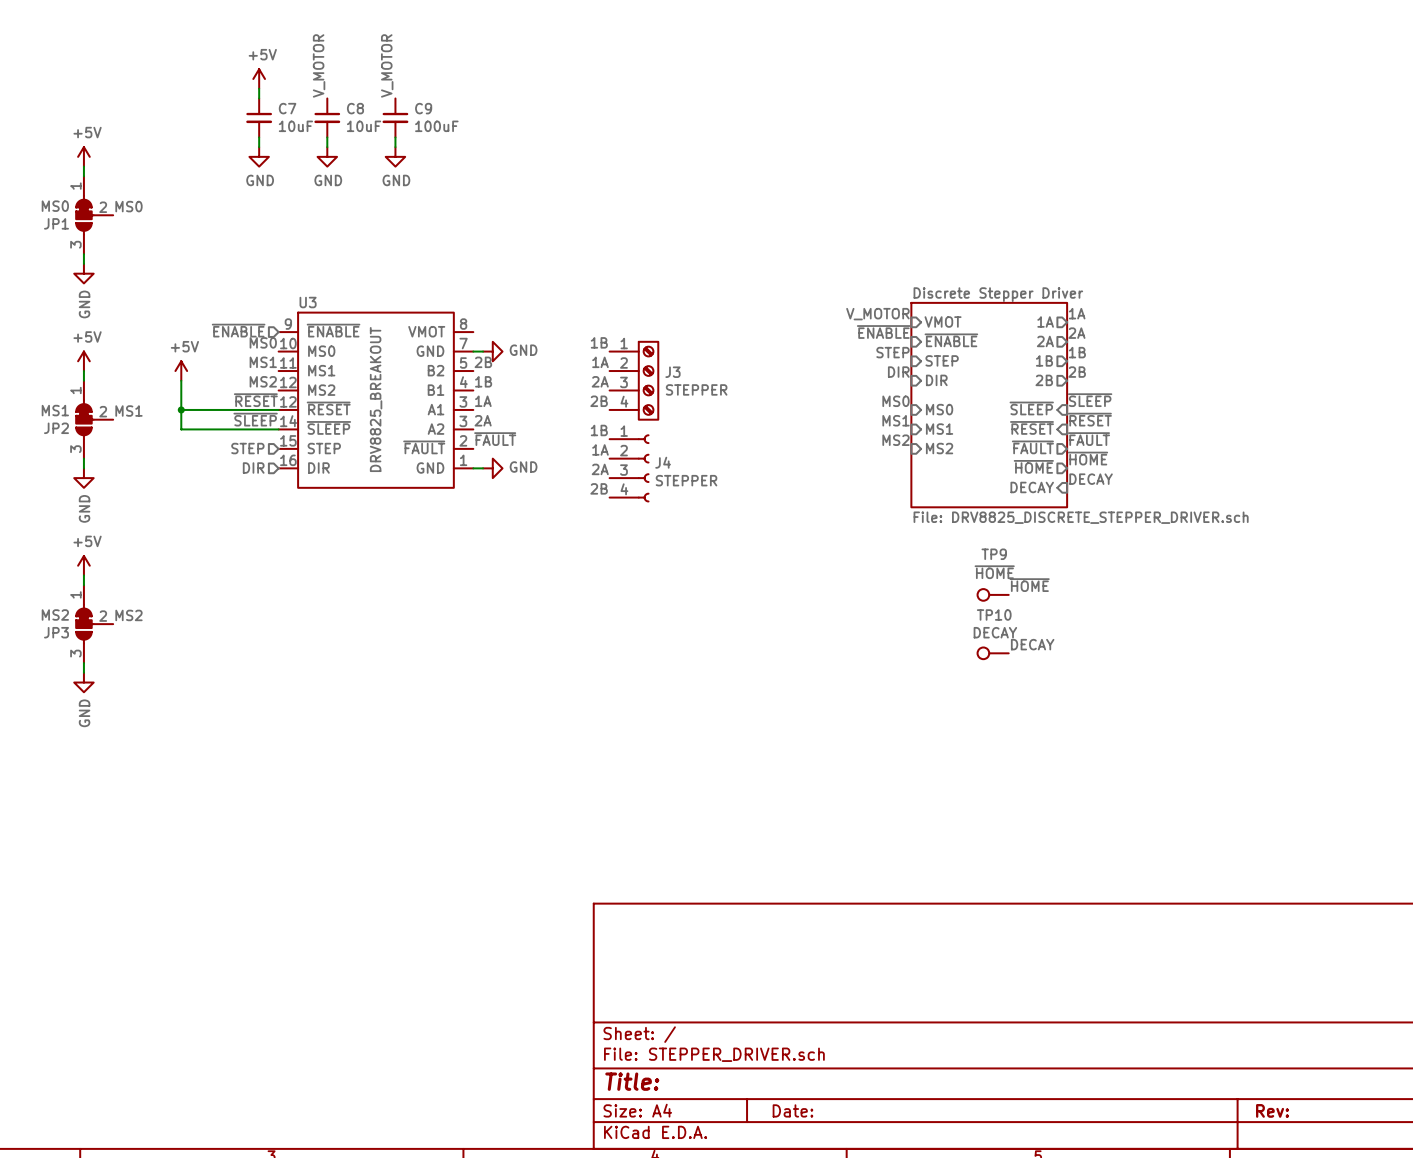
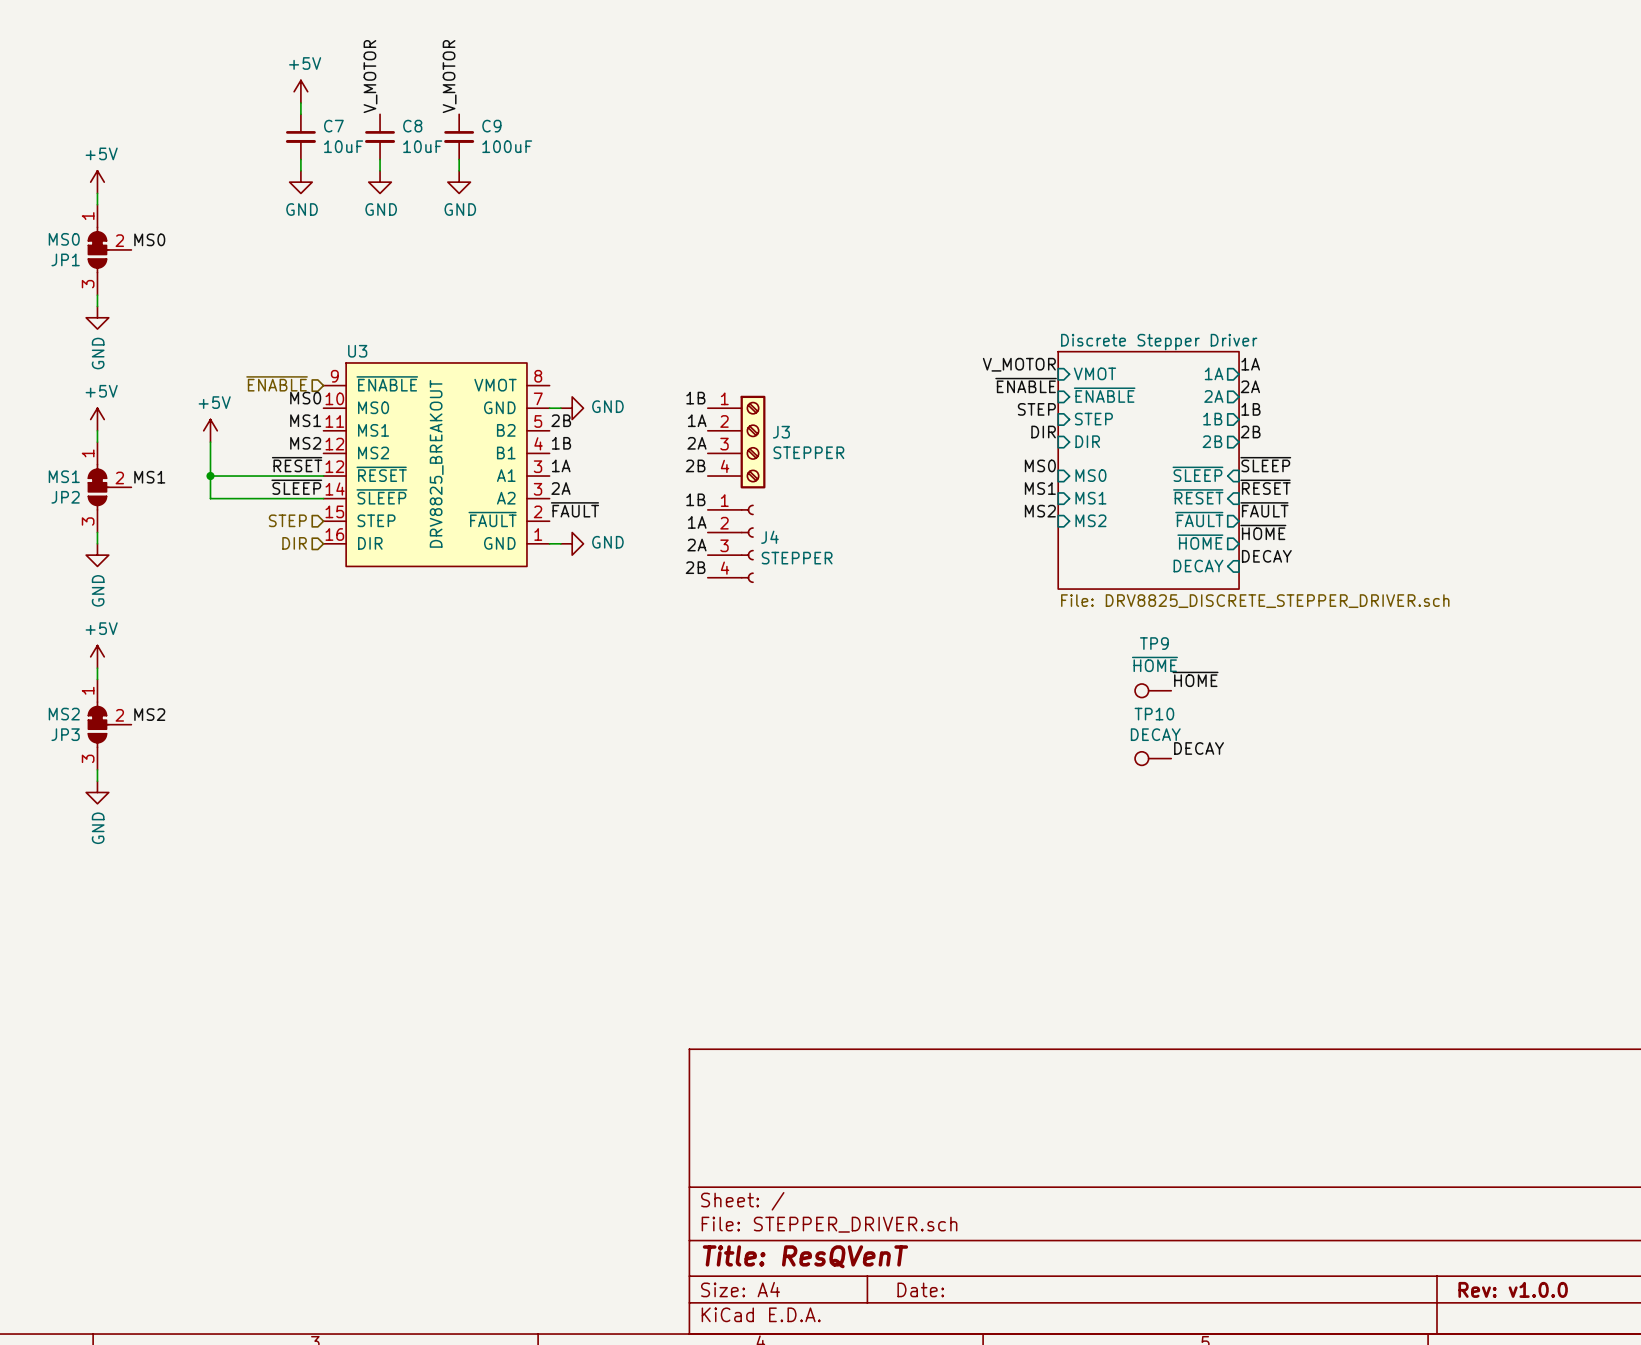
title block: Title: (632, 1081) -> Title: ResQVenT (805, 1256)
title block: Rev: (1272, 1110) -> Rev: v1.0.0 (1513, 1289)

